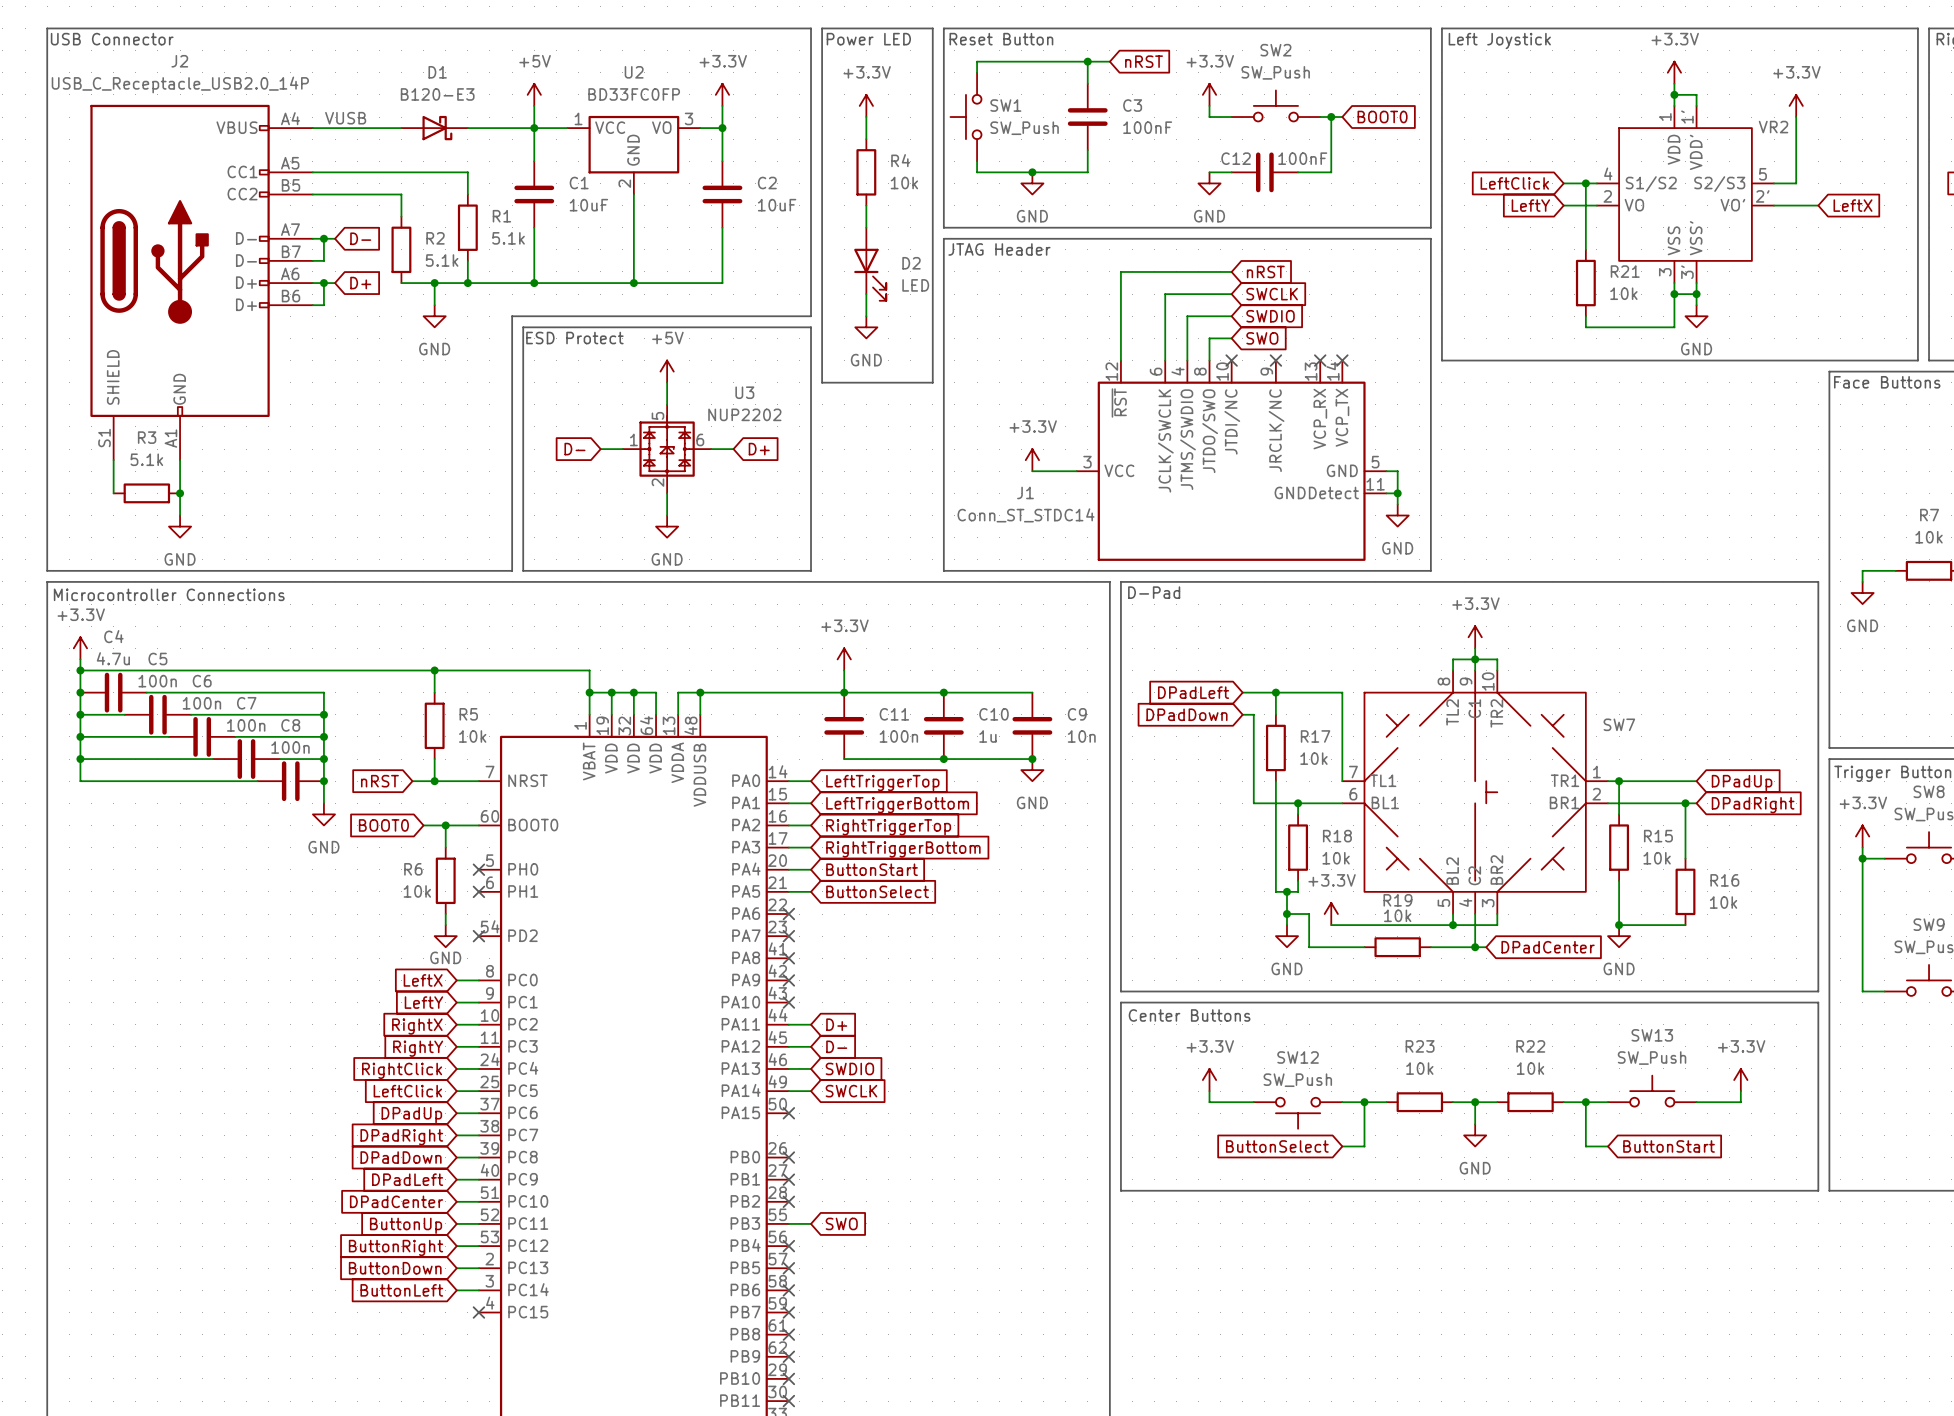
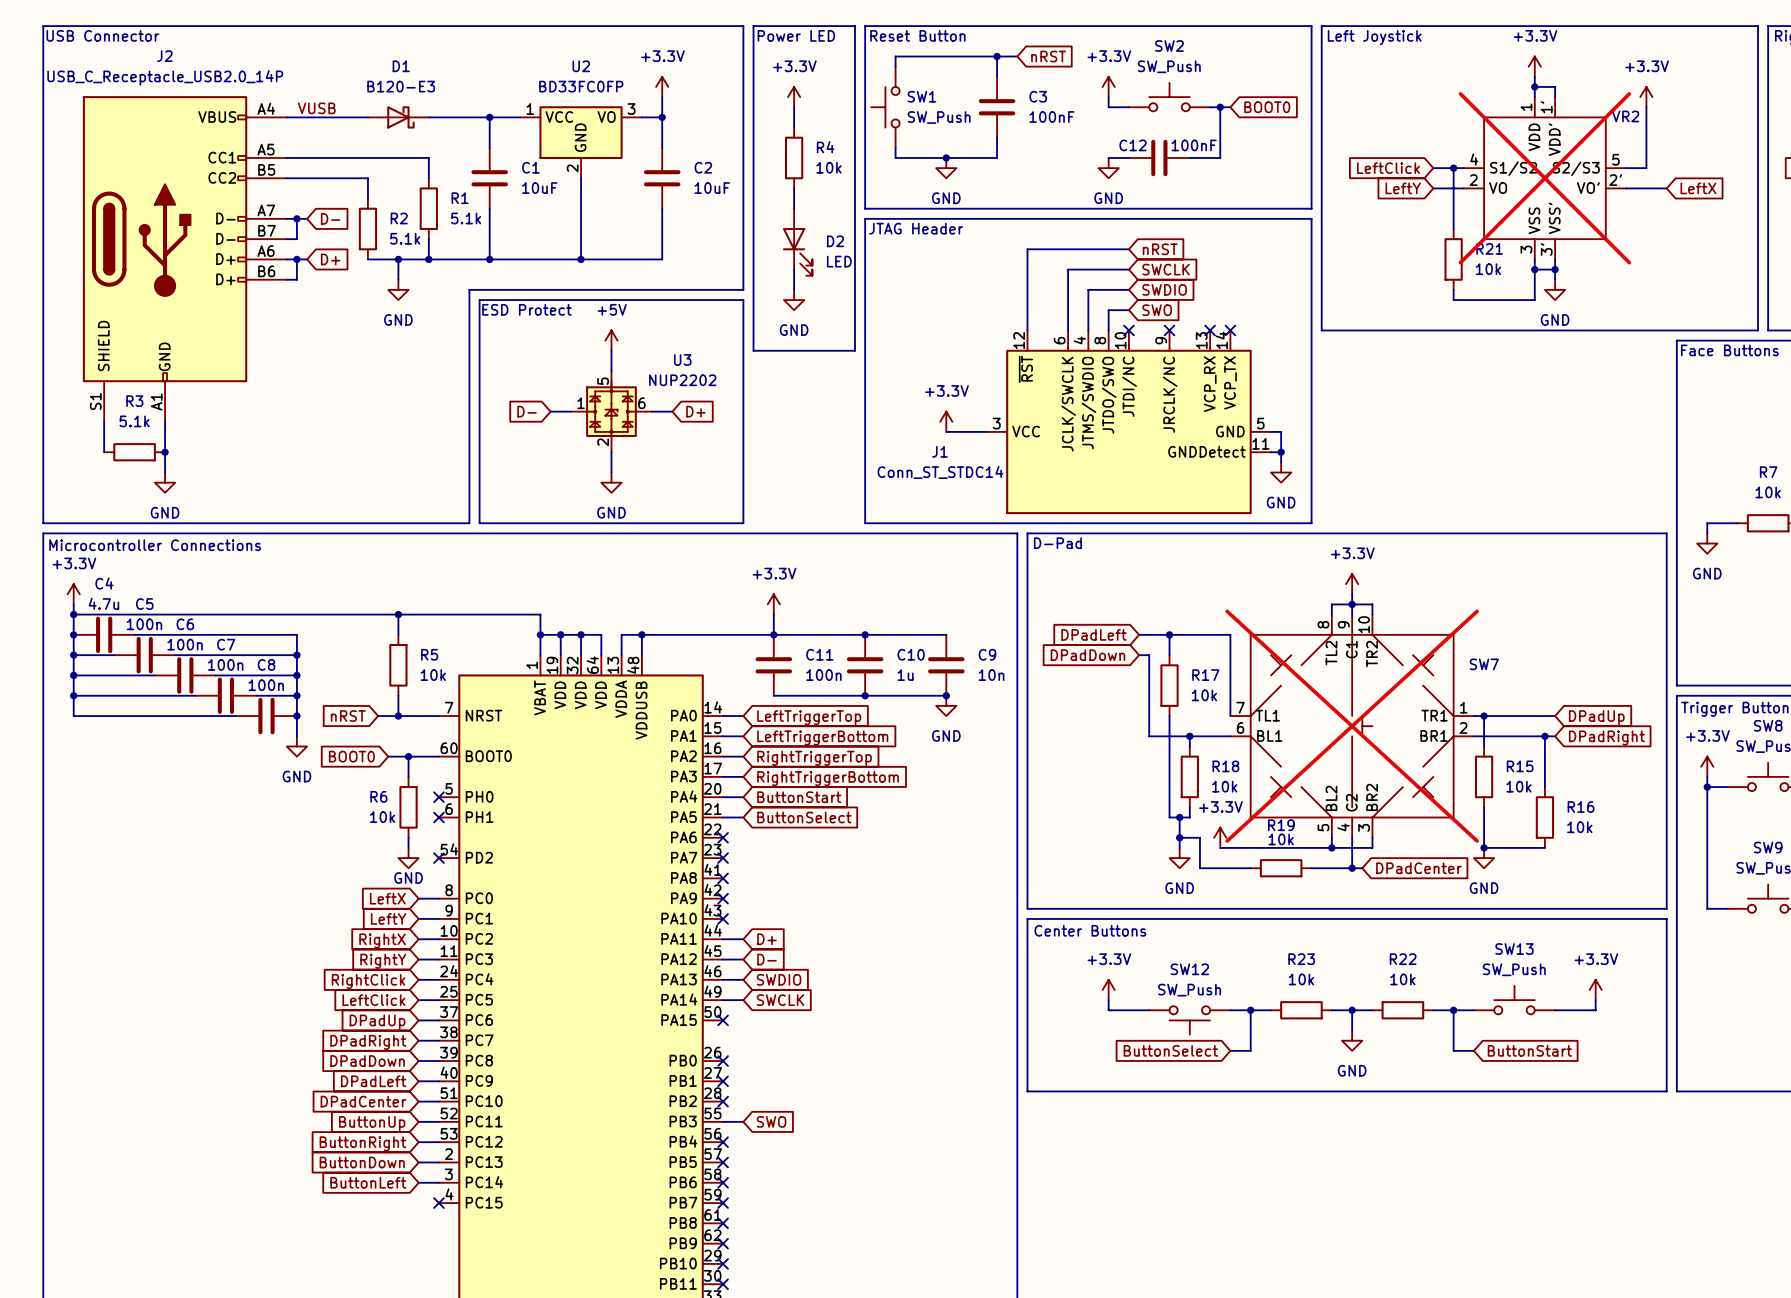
power symbol: +5V (534, 94) -> none
wire: (534, 105) (534, 128) -> none
VR2 do-not-place cross: none -> (1544, 178)
SW7 do-not-place cross: none -> (1352, 726)

